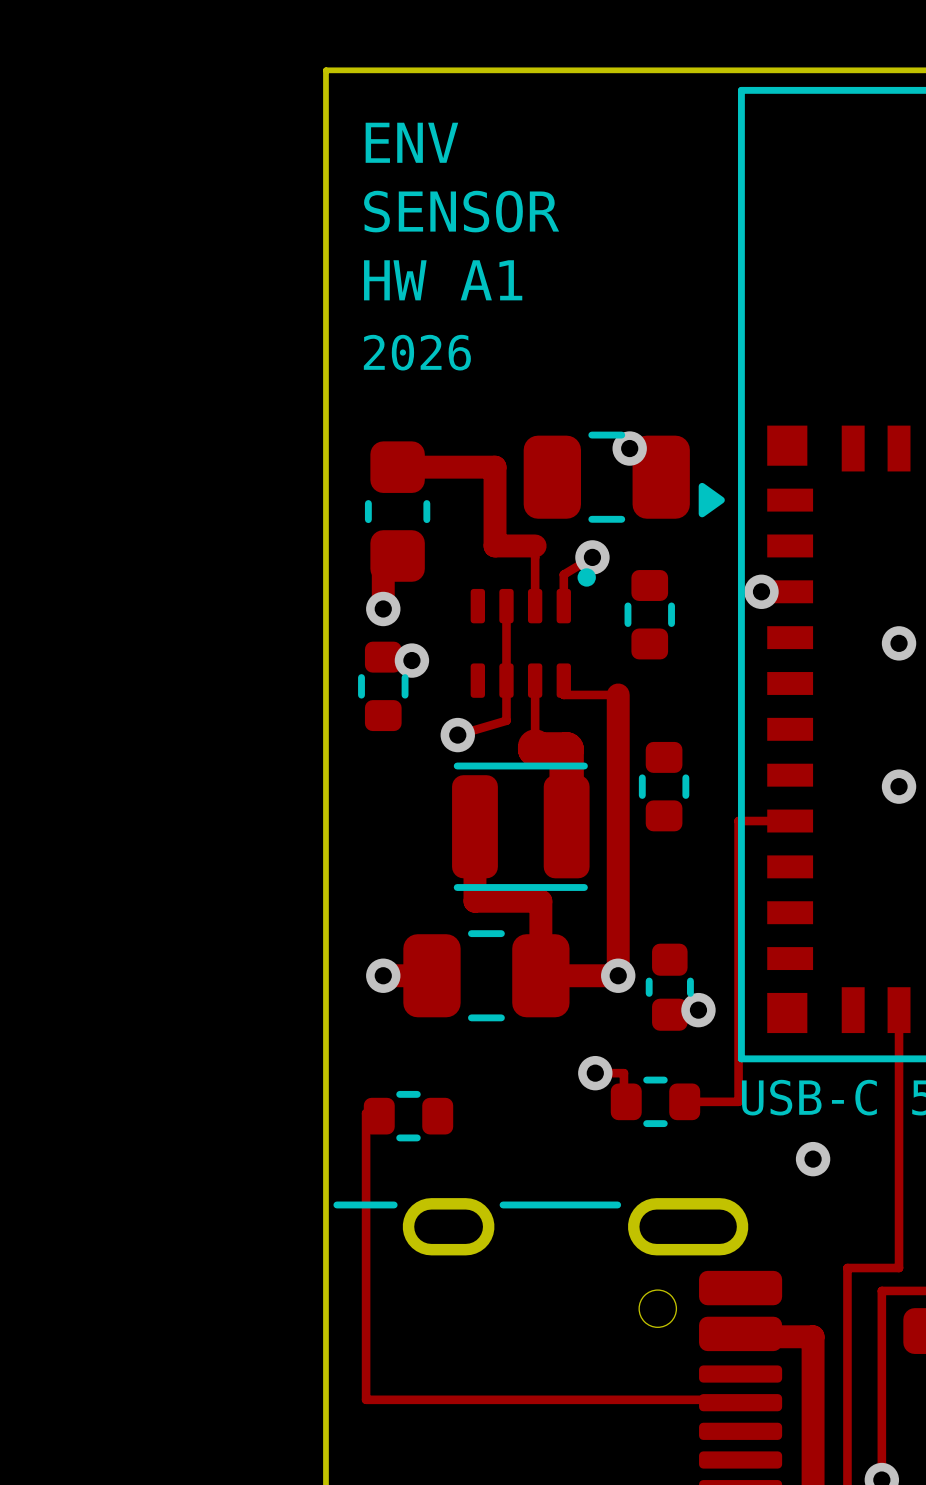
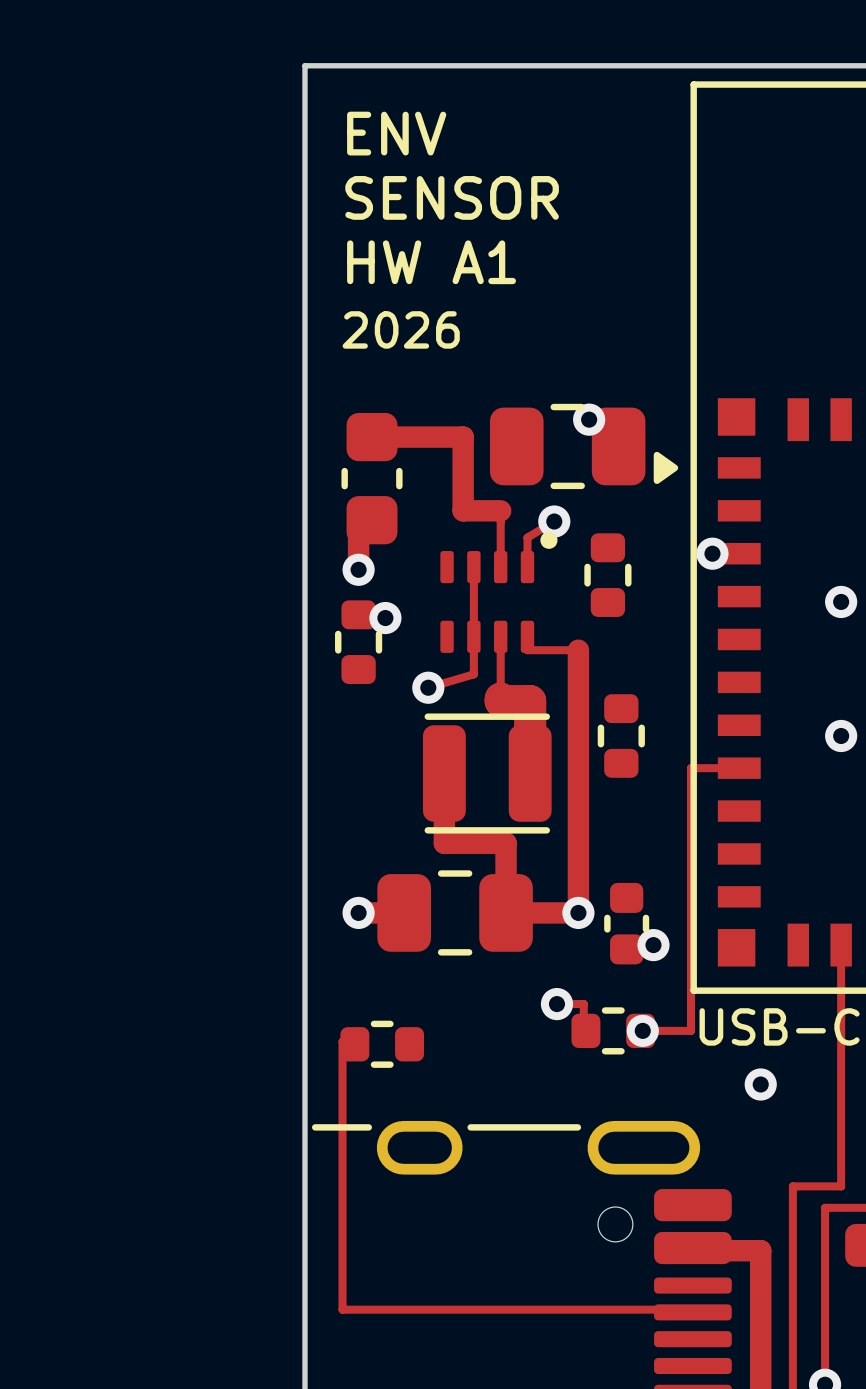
via: none -> (642, 1030)

